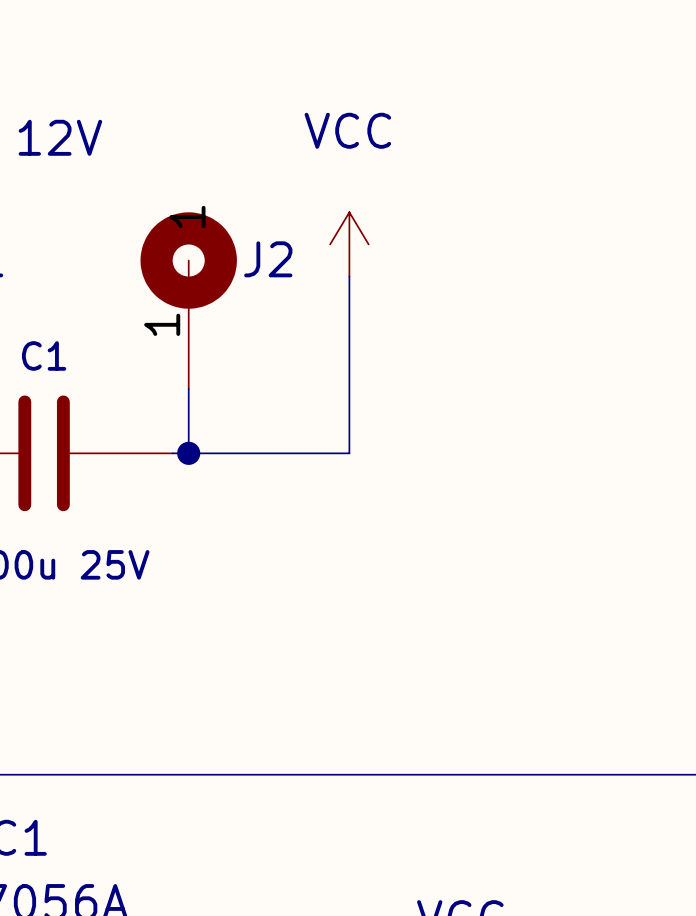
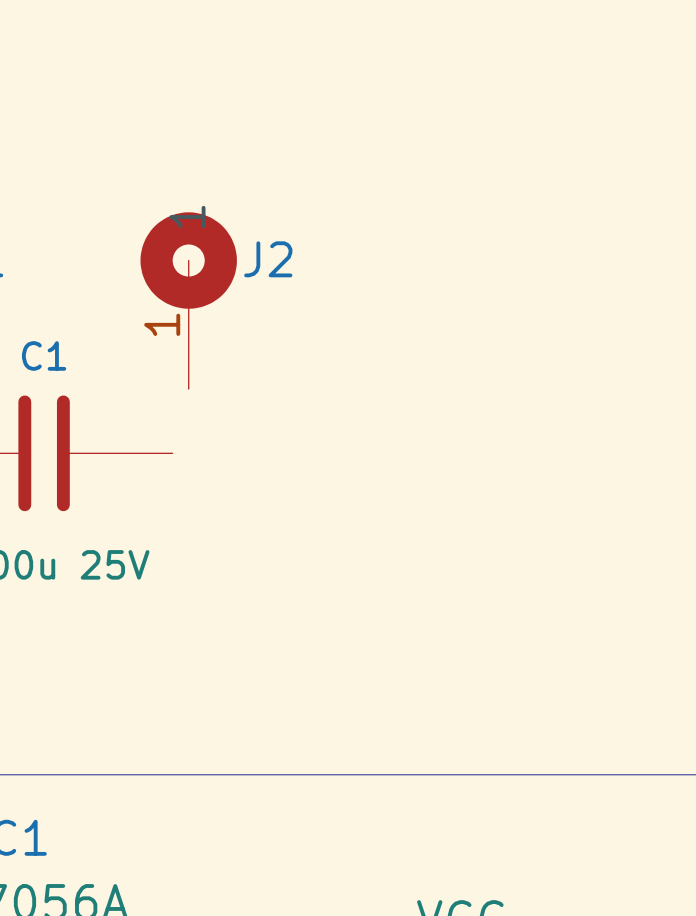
text: 12V (60, 137) -> none
power symbol: VCC (349, 244) -> none
wire: (349, 276) (349, 453) (172, 453) -> none
wire: (188, 389) (188, 453) -> none
junction: (188, 453) -> none

